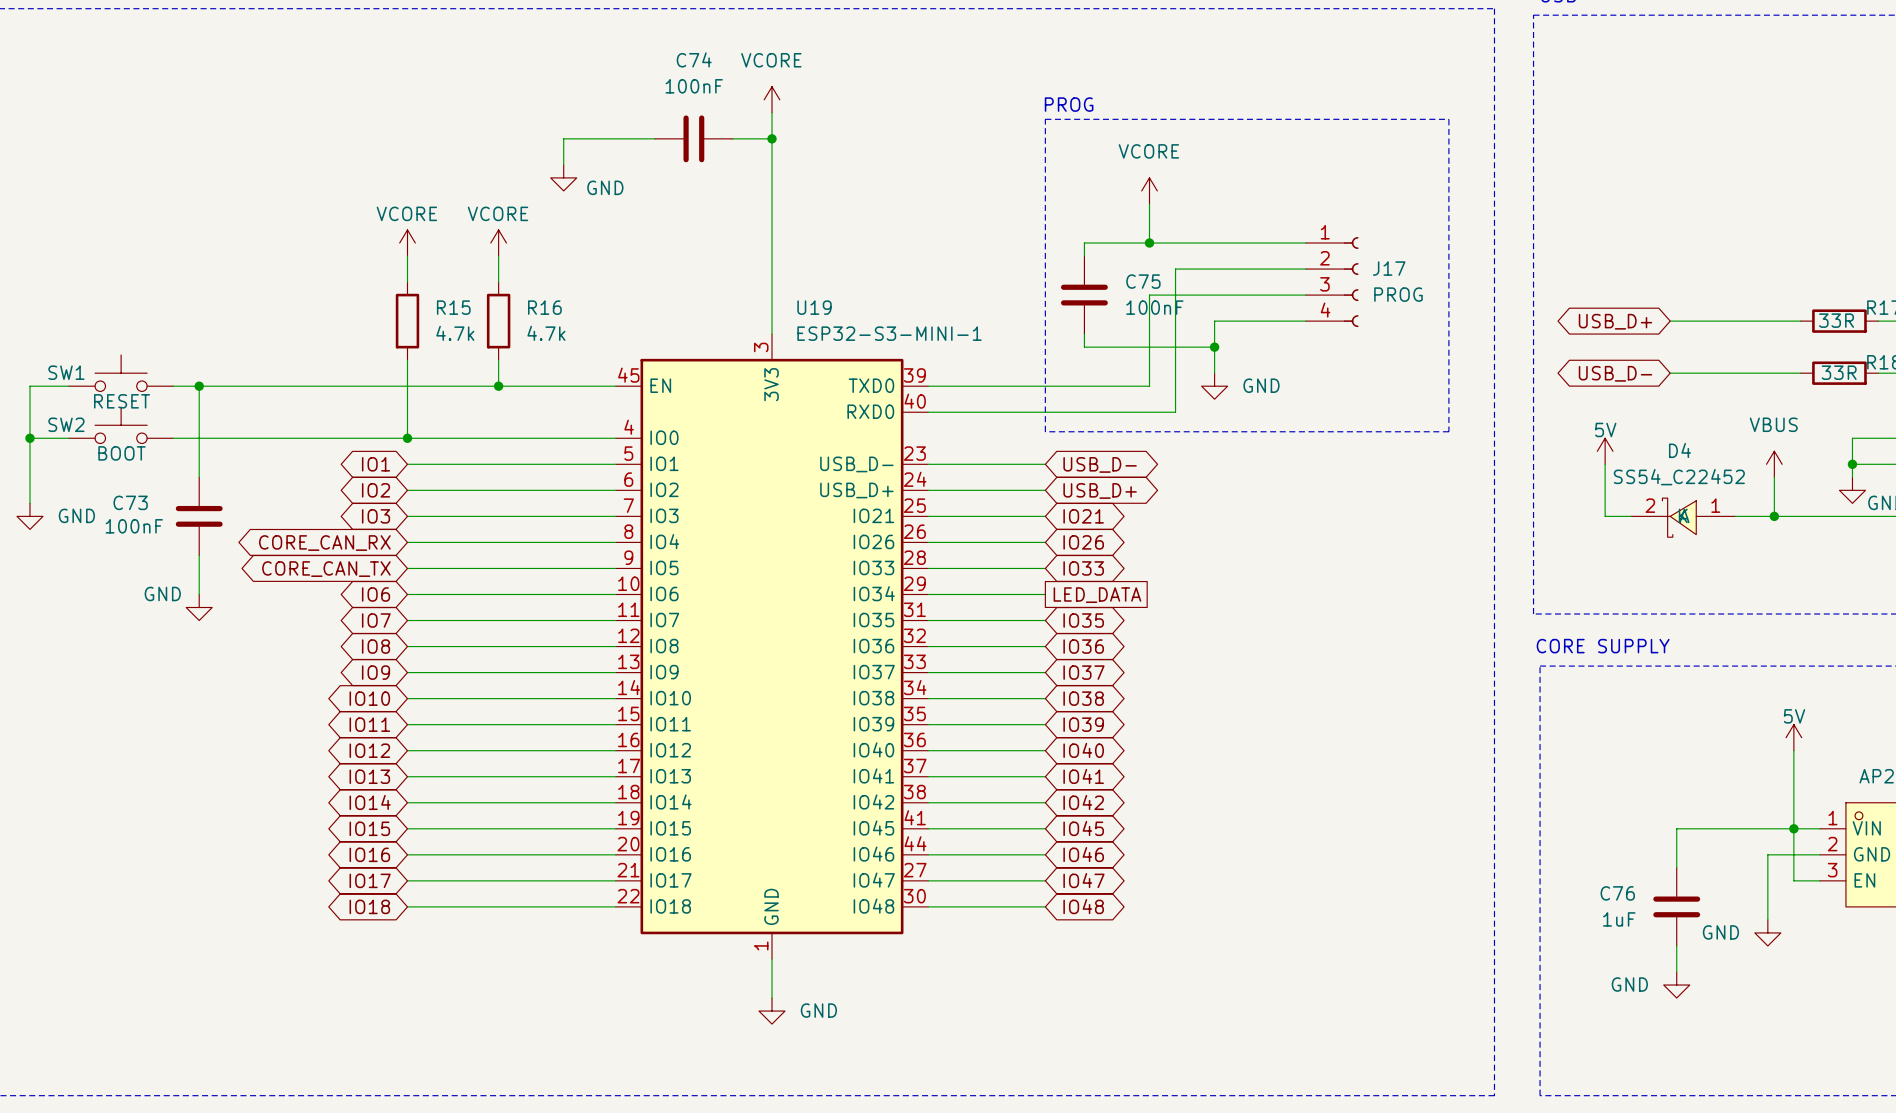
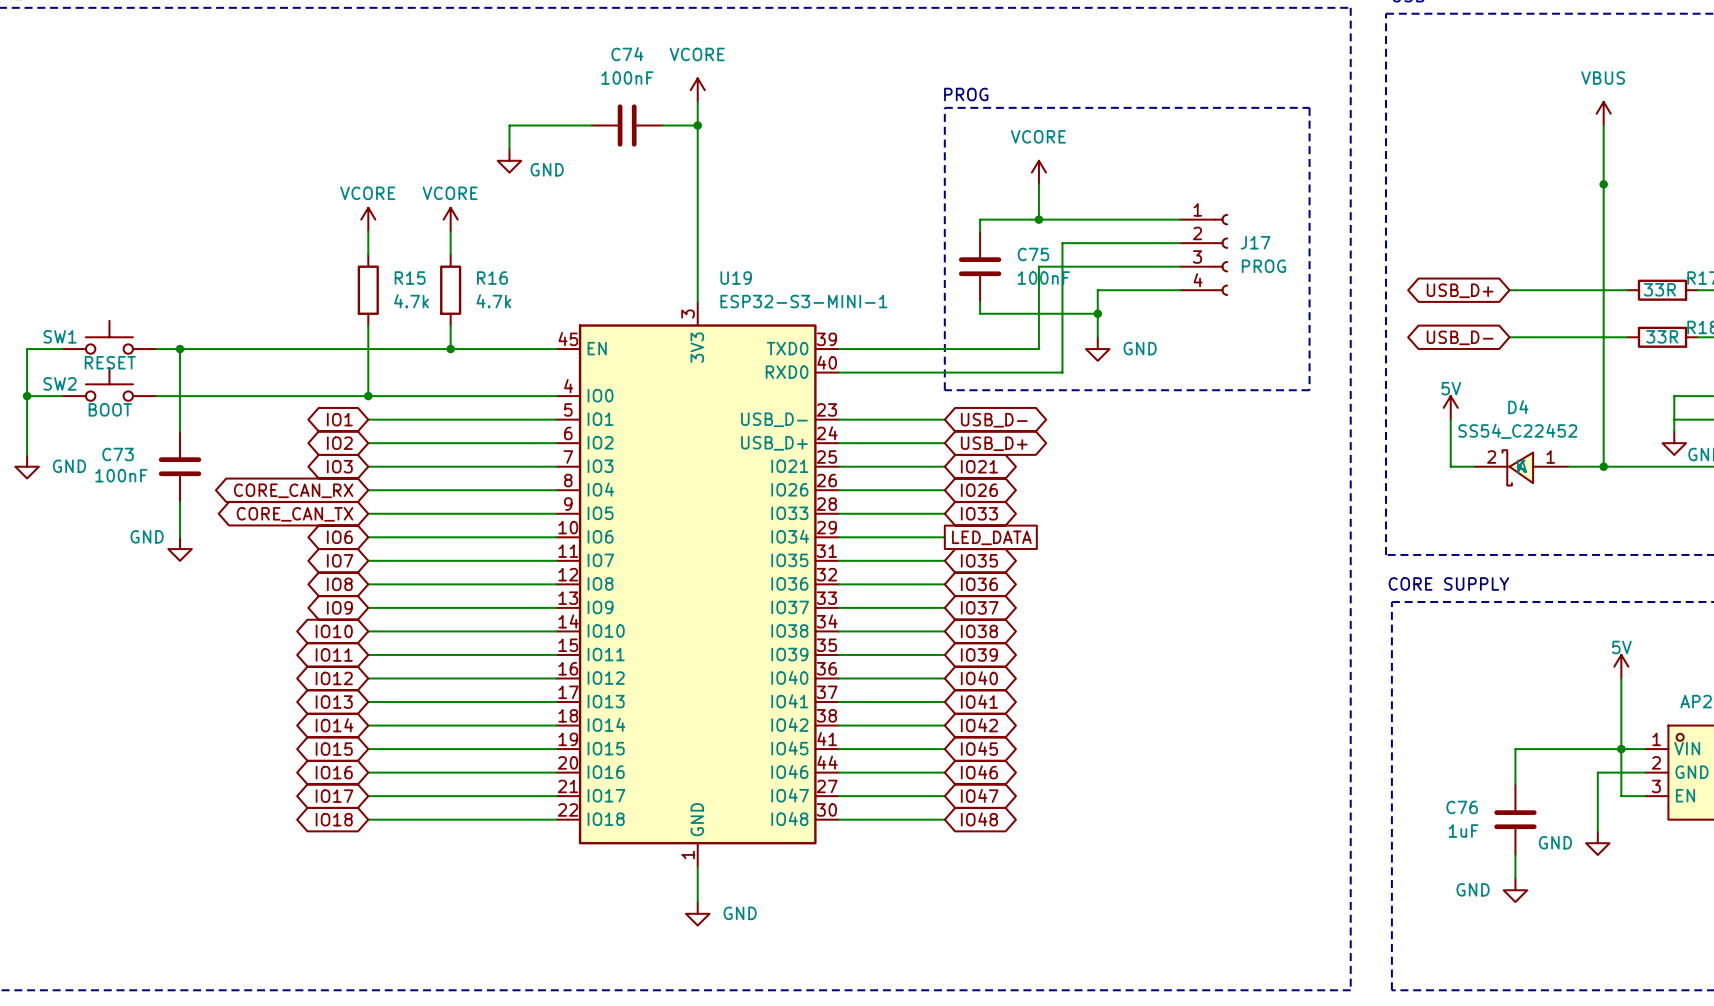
power symbol: none -> VBUS (1603, 113)
wire: none -> (1603, 125) (1603, 431)
junction: none -> (1603, 184)
power symbol: VBUS (1774, 464) -> none
junction: (1852, 464) -> none

